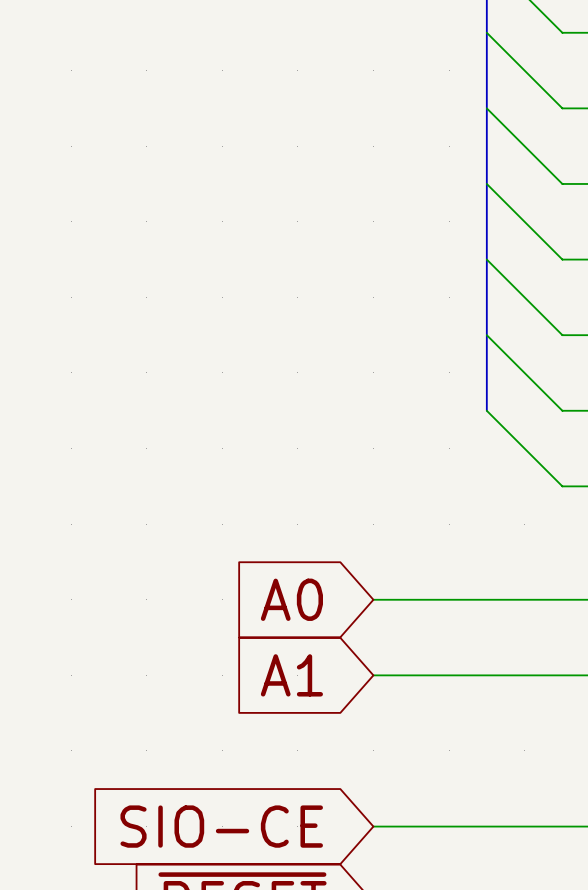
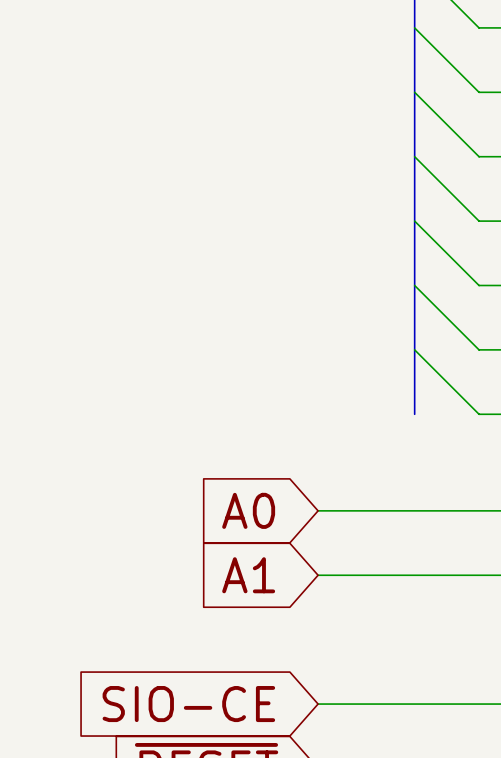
bus: none -> (414, 349) (414, 414)

